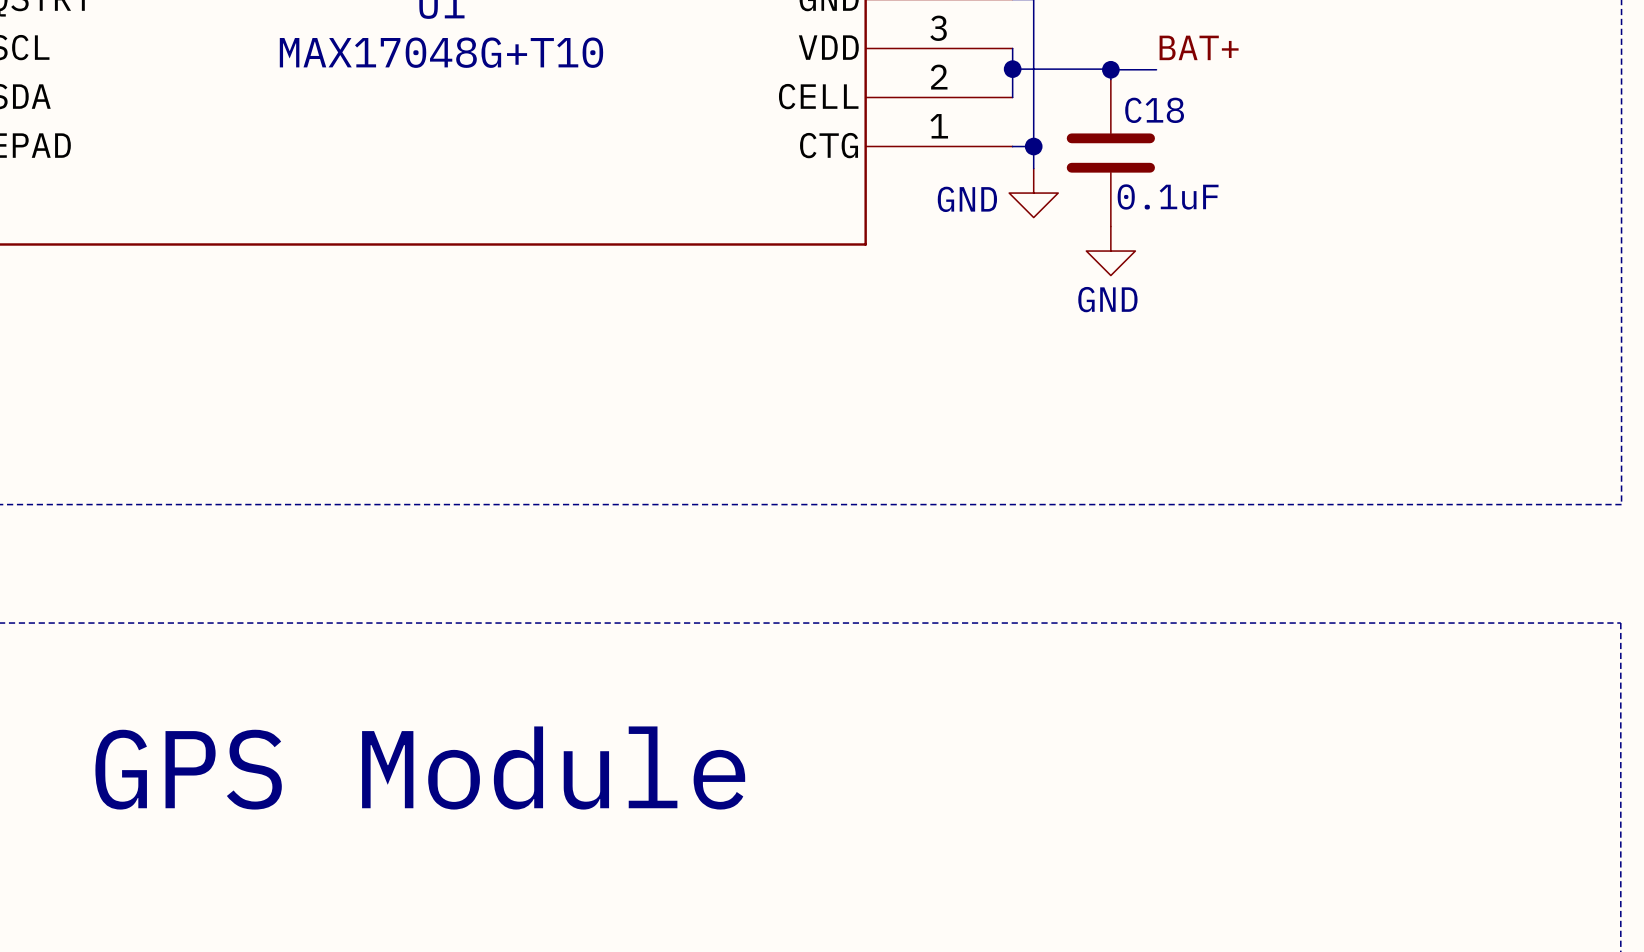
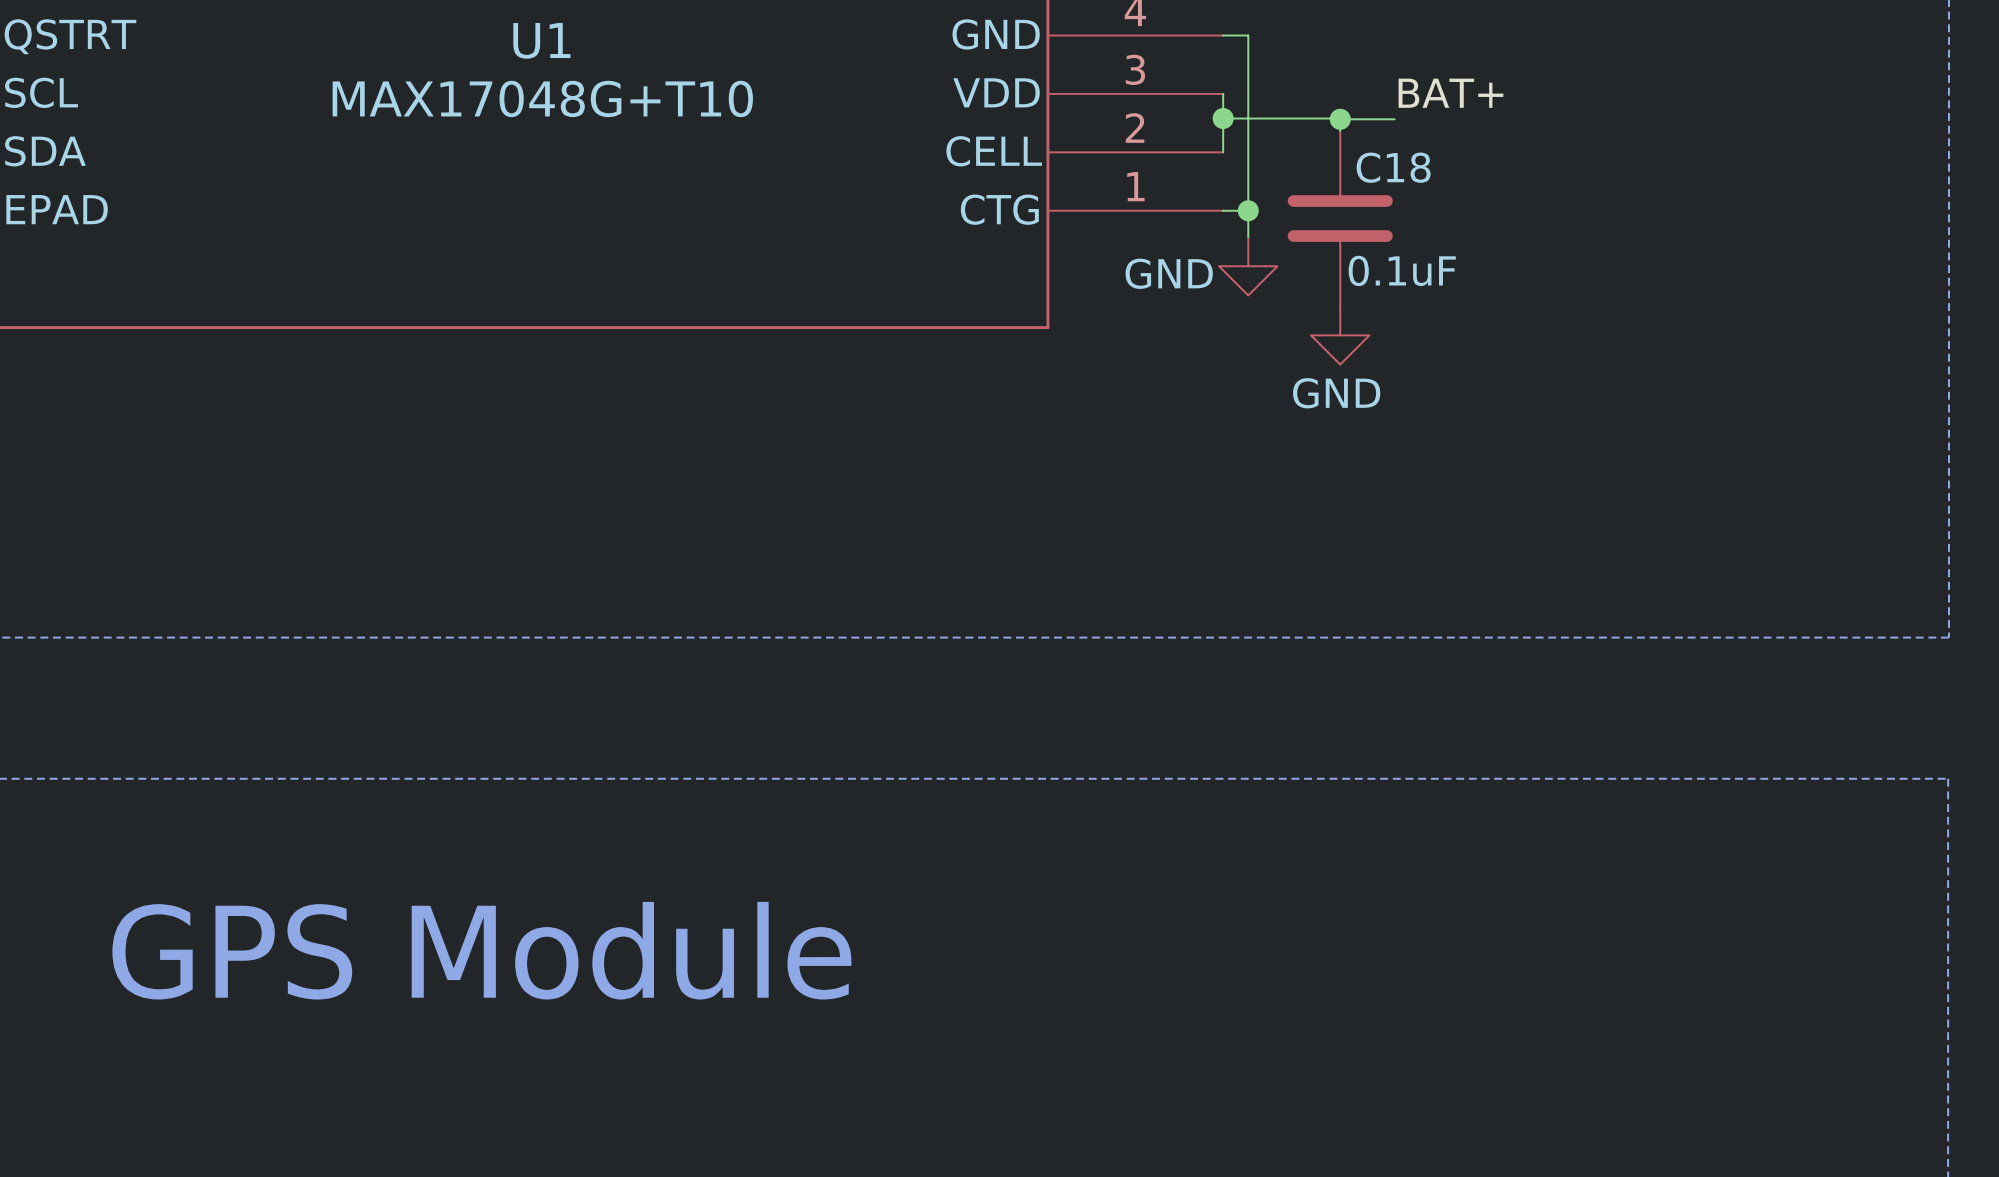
text position: GPS Module (420, 768) -> GPS Module (481, 950)

